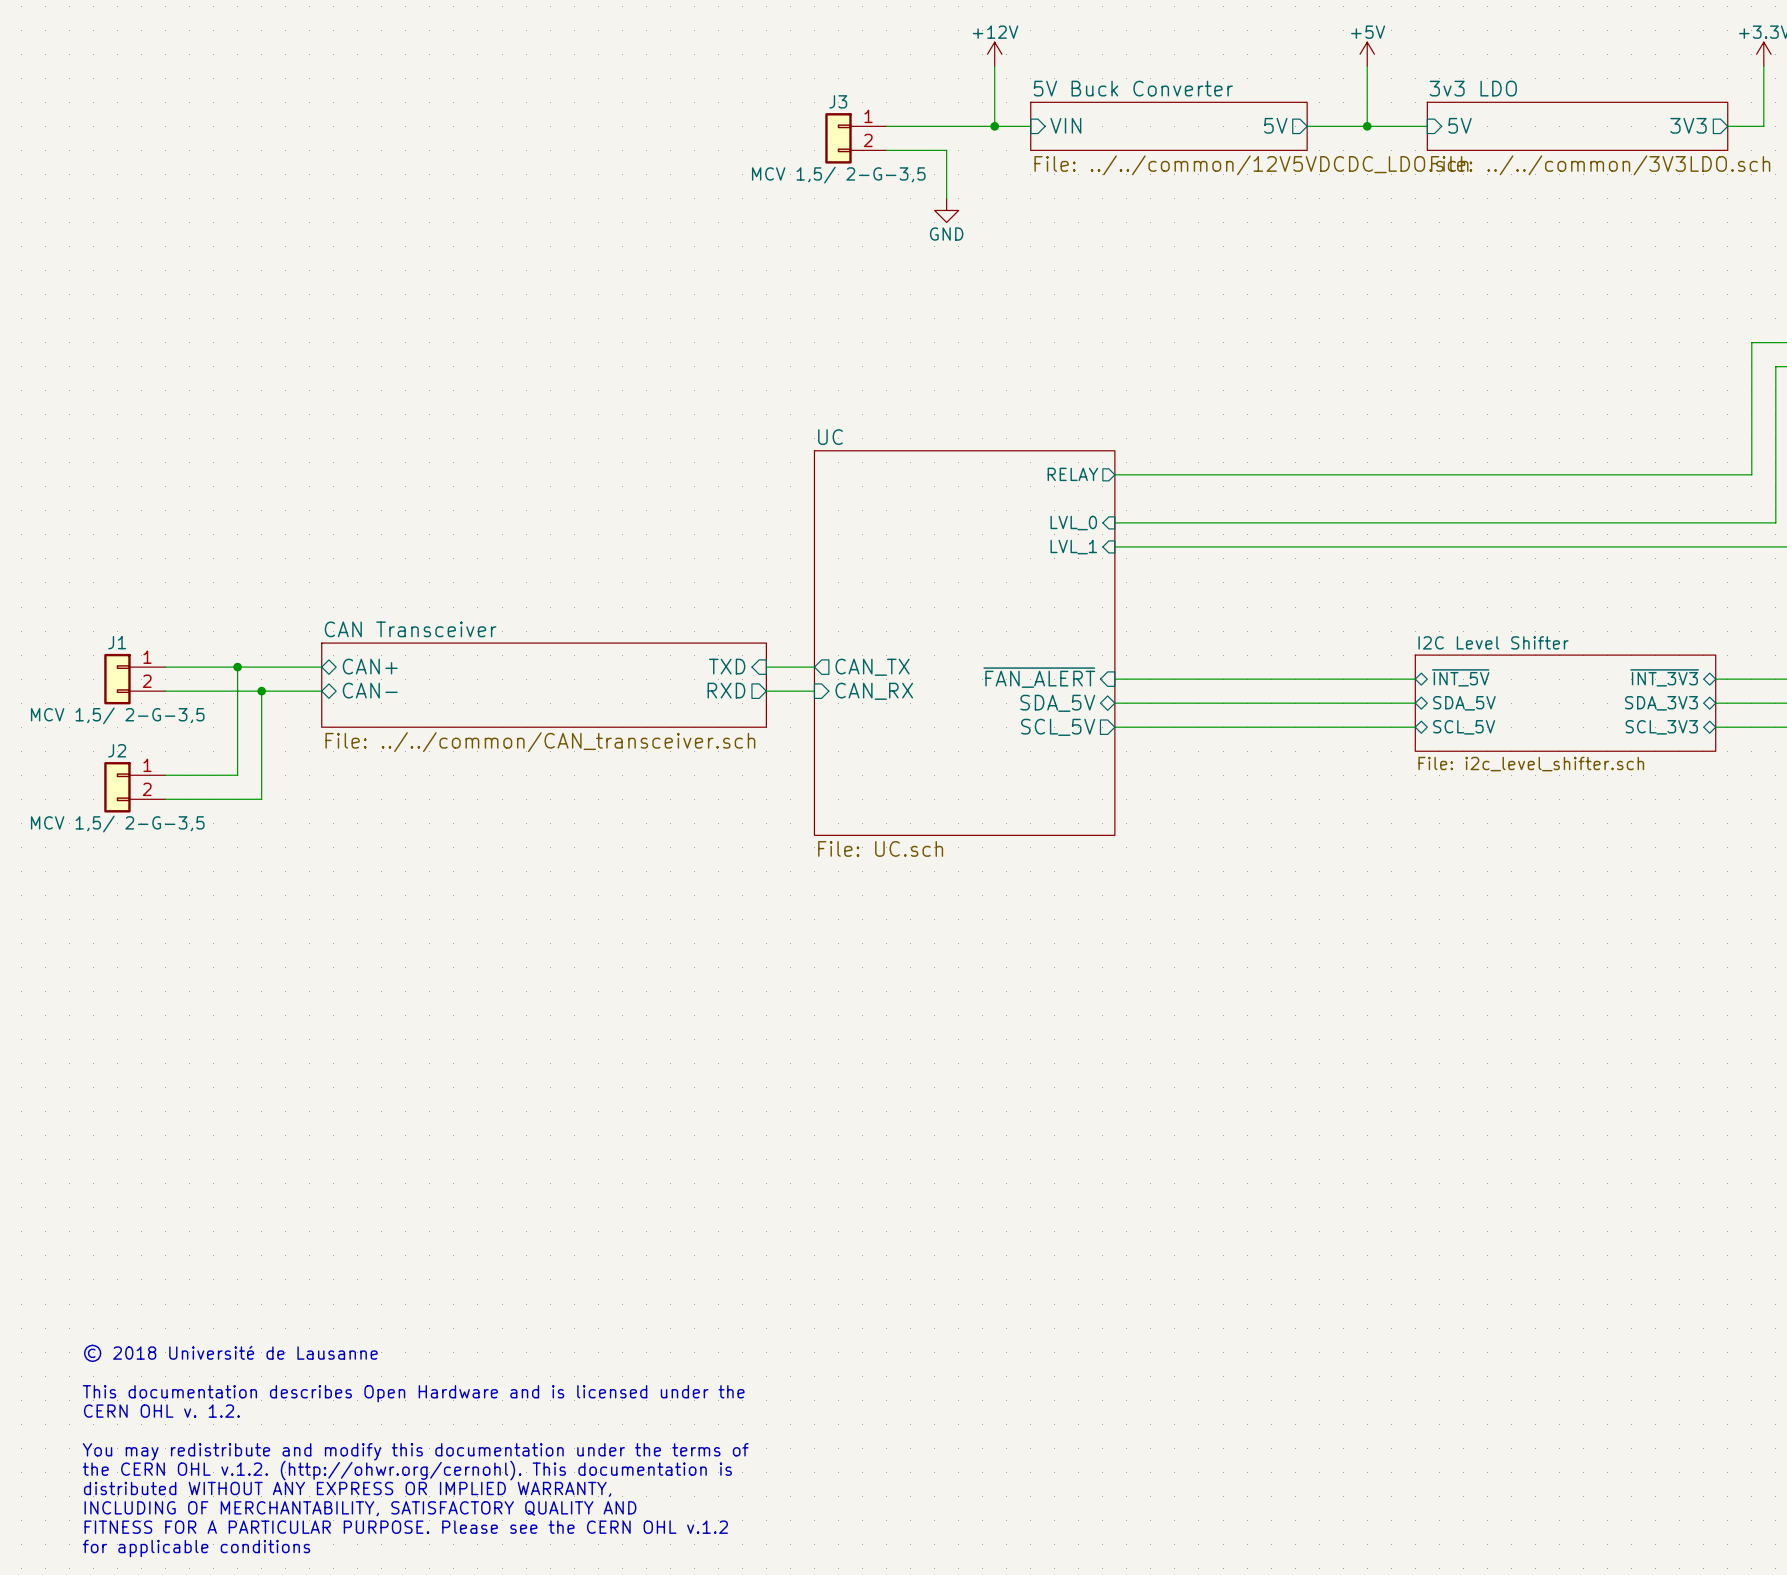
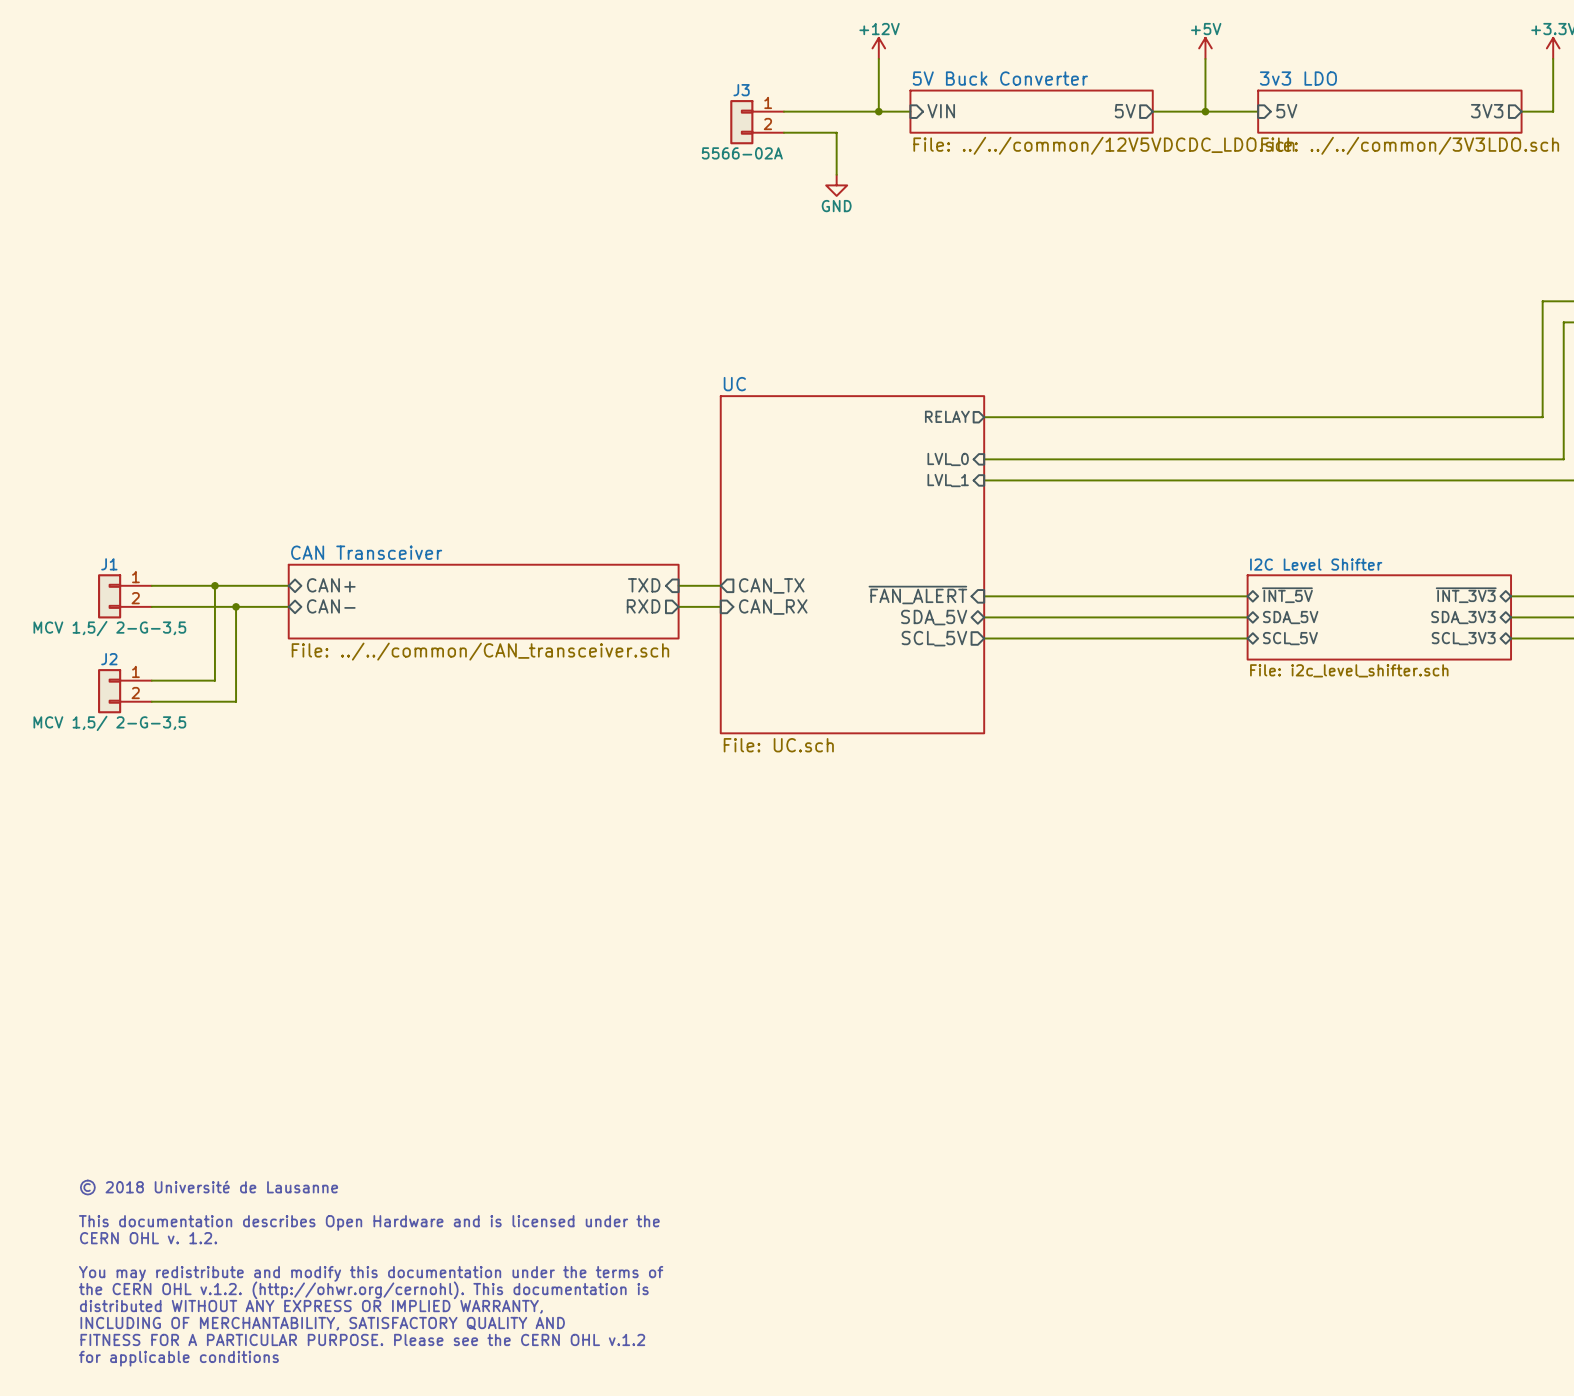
J3 value: MCV 1,5/ 2-G-3,5 (838, 175) -> 5566-02A (742, 153)

